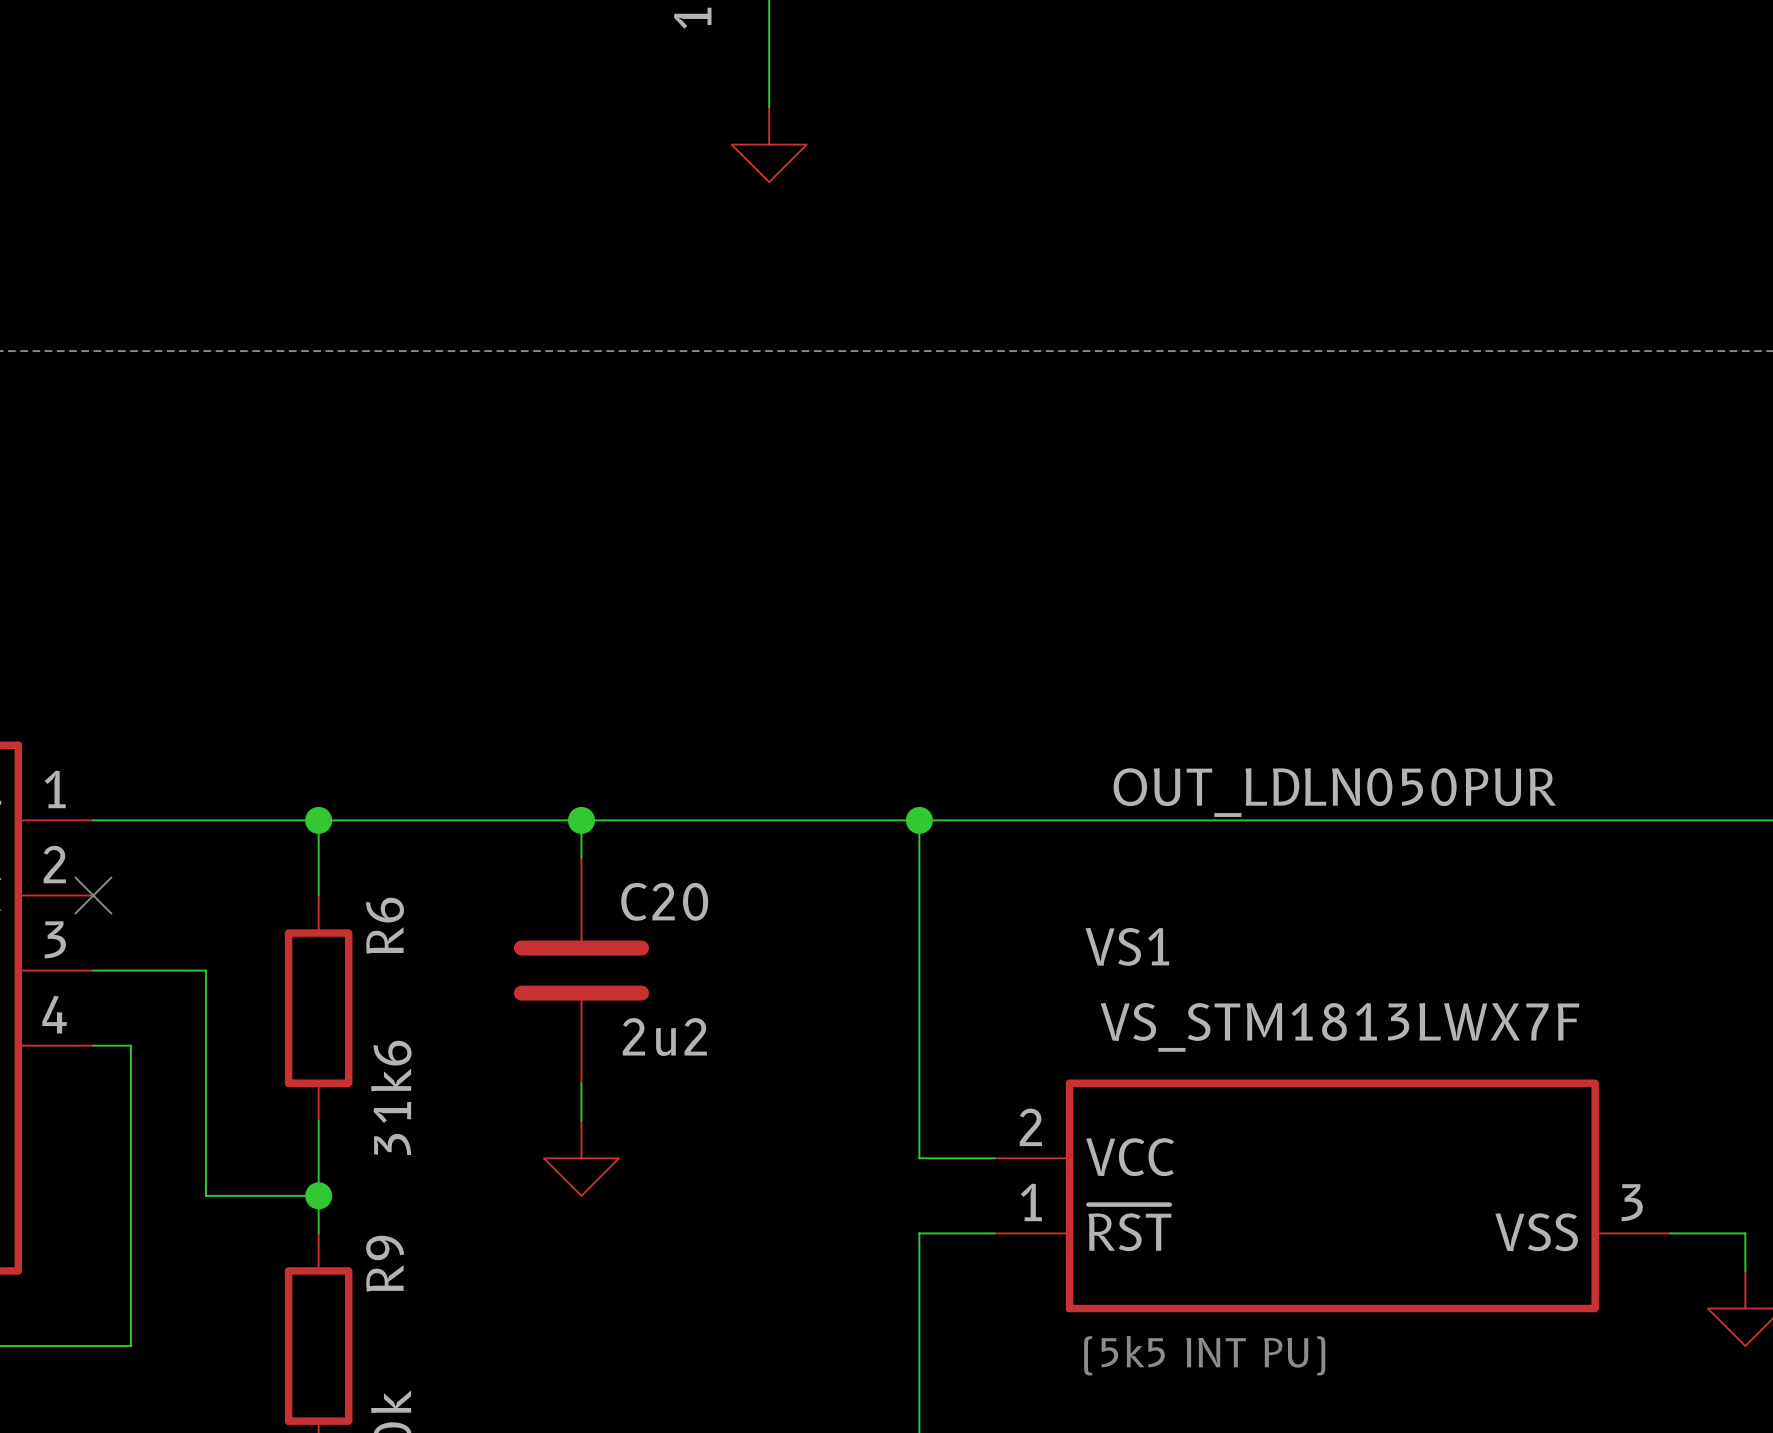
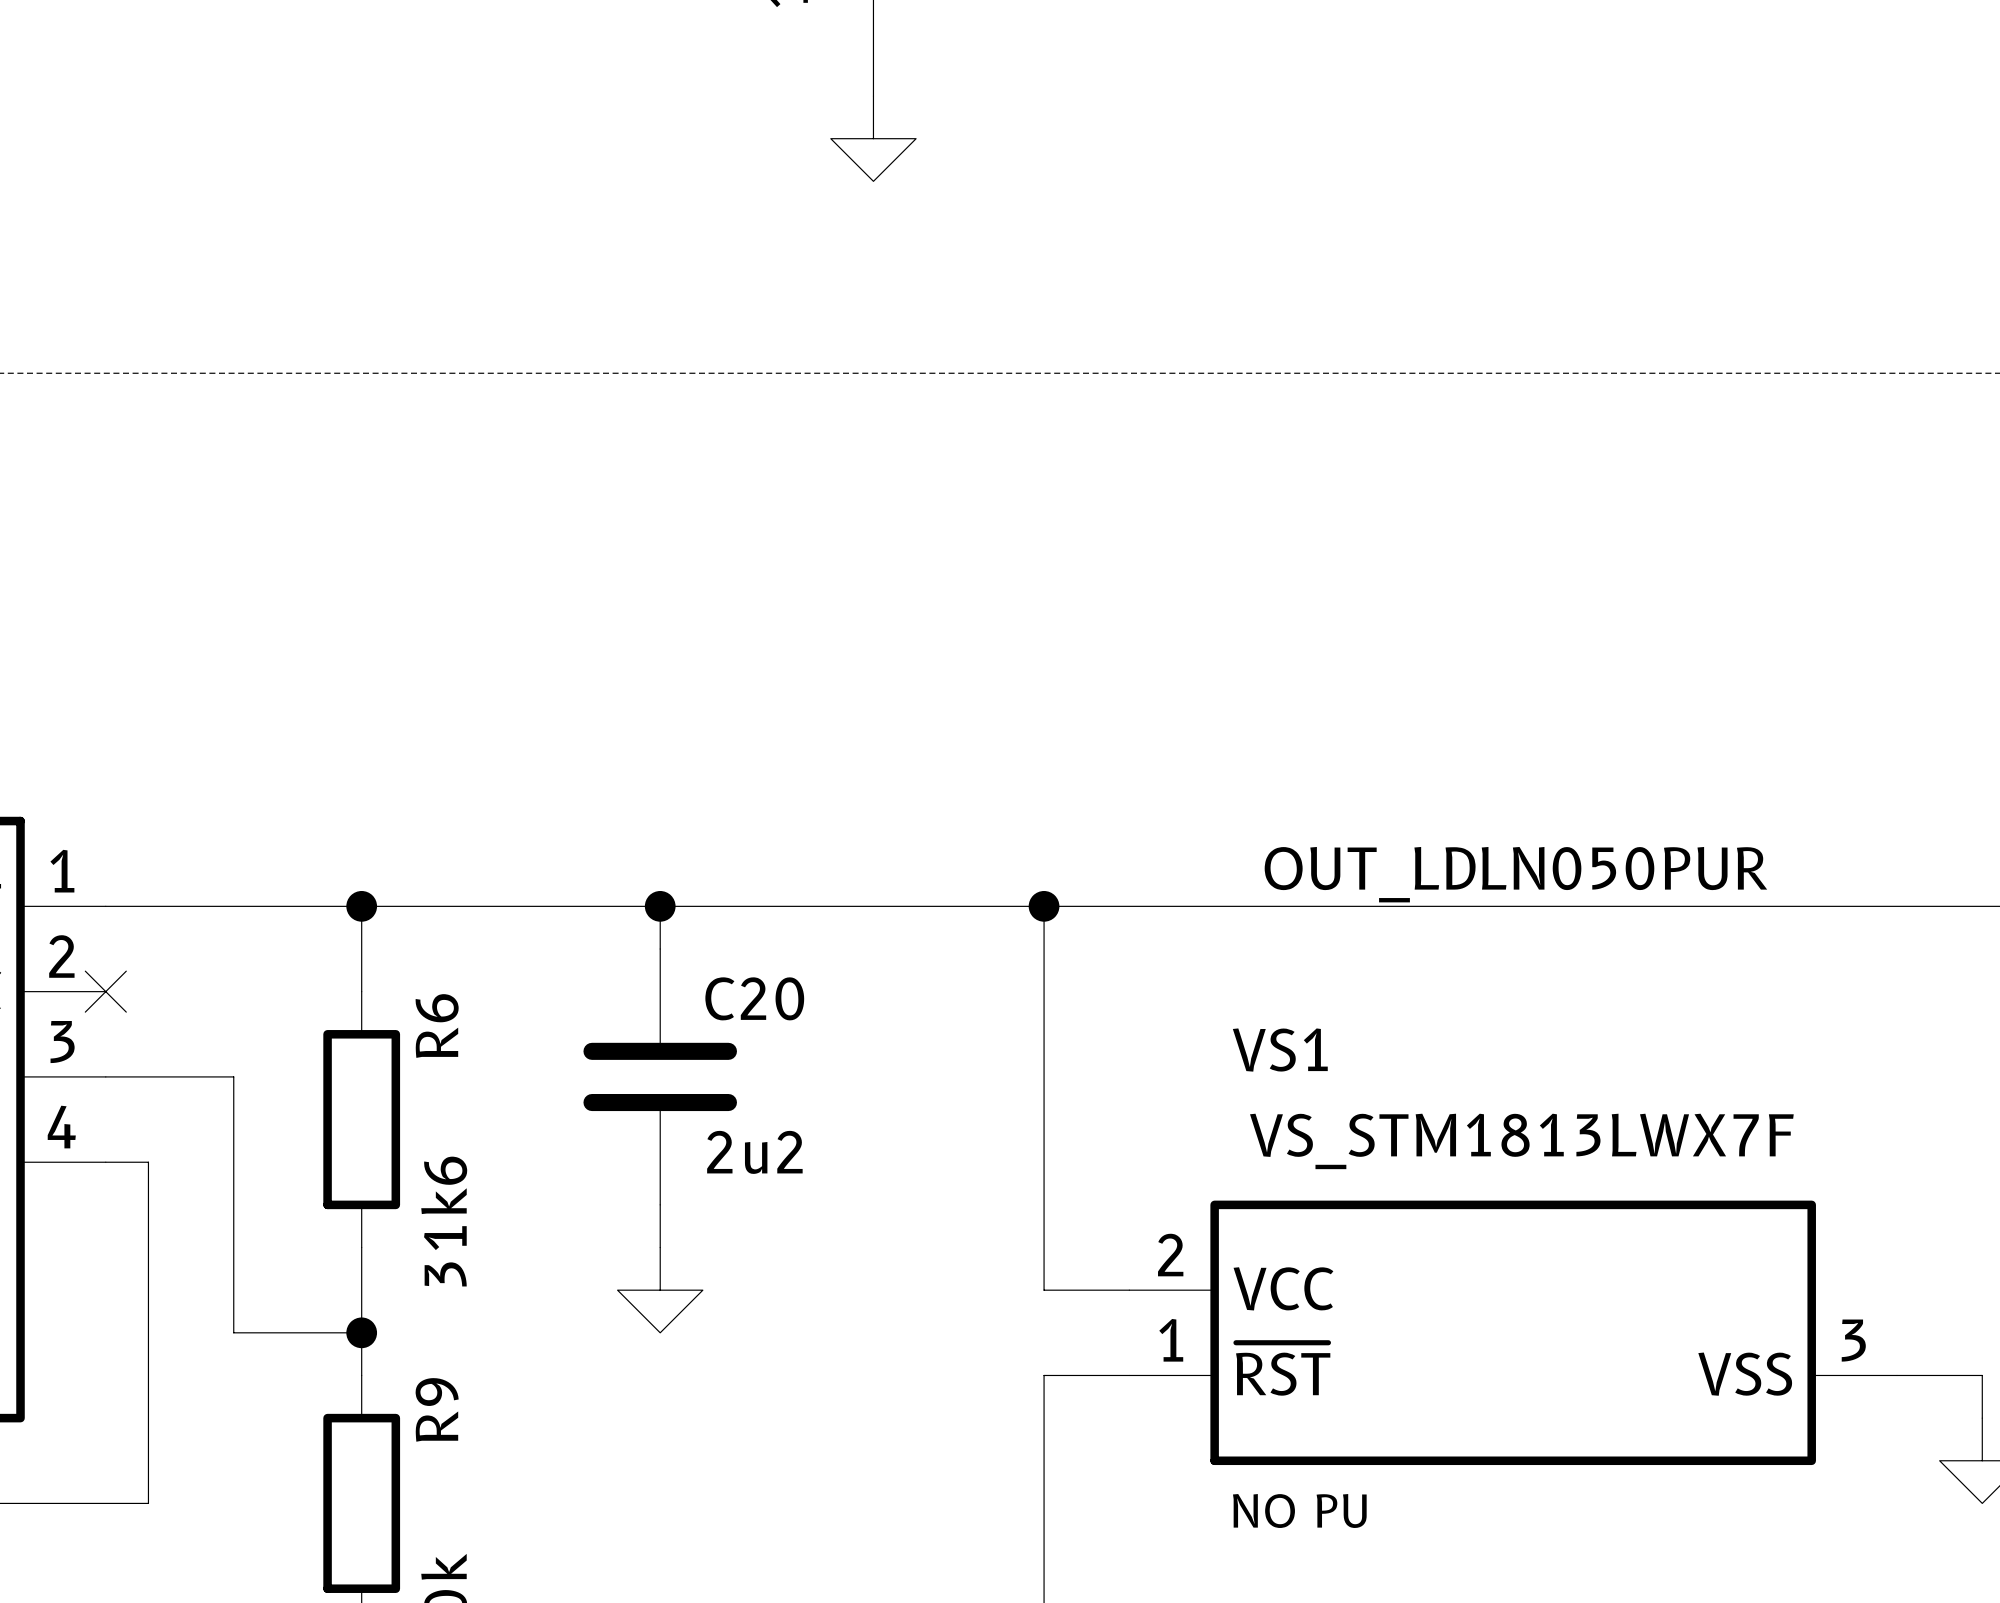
text: none -> NO PU (1299, 1511)
text: (5k5 INT PU) (1204, 1355) -> none

